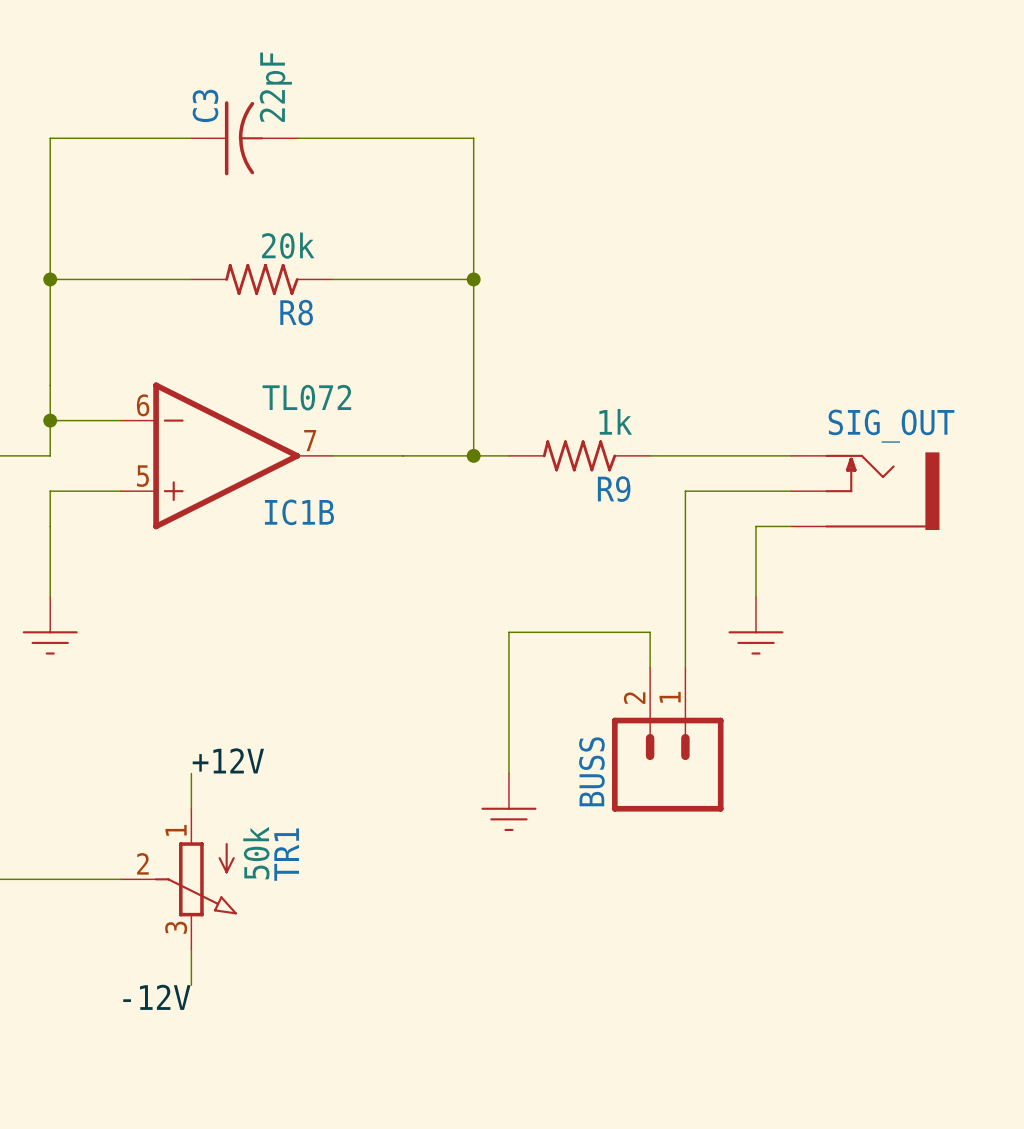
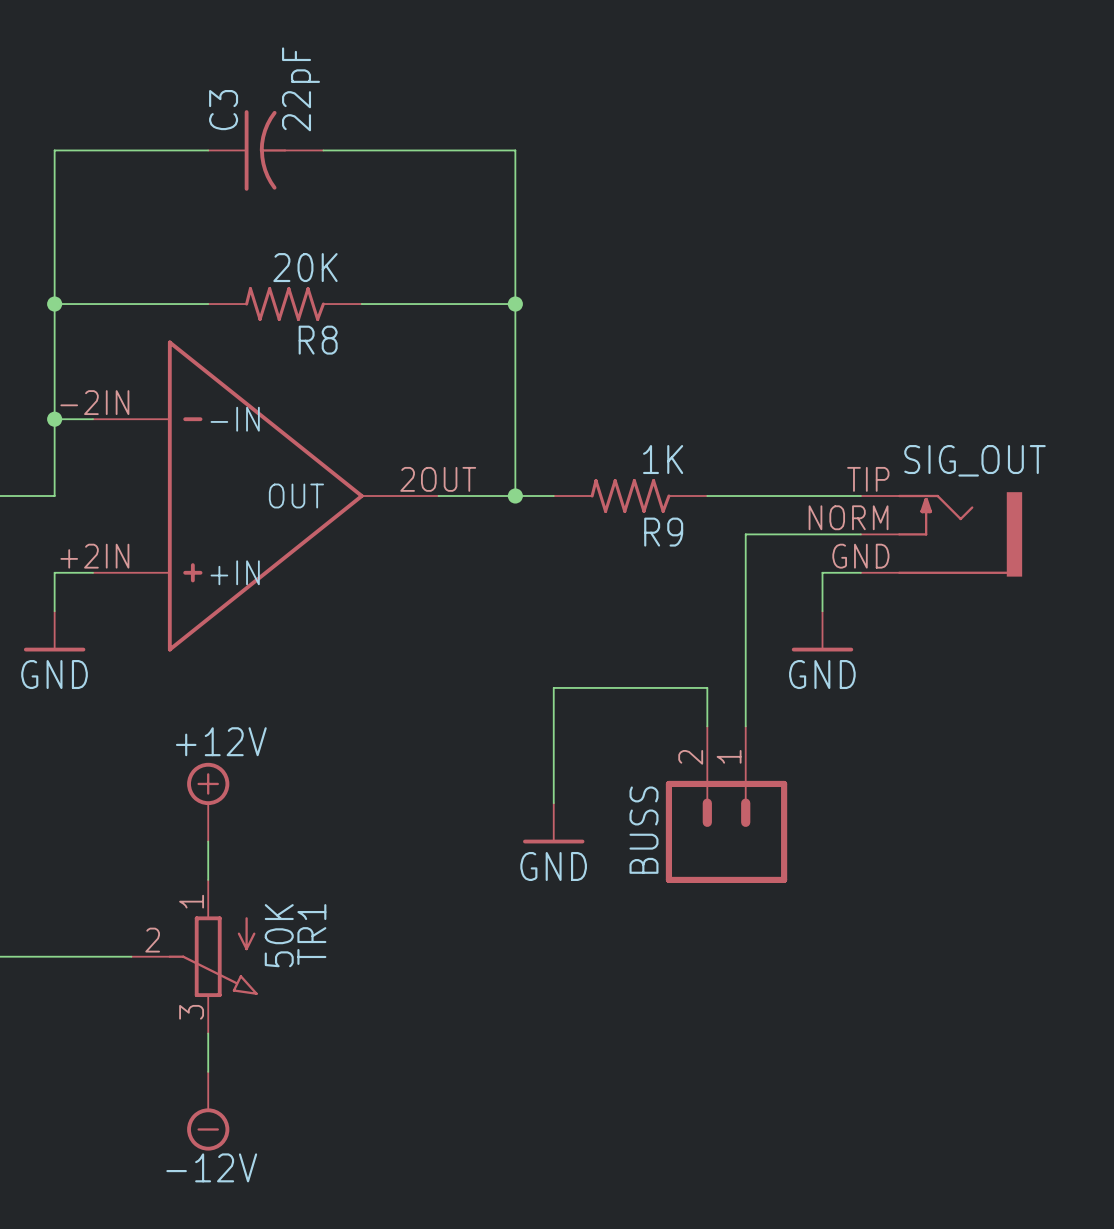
R8 value: 20k (288, 245) -> 20K (305, 267)
wire: none -> (54, 419) (93, 419)
wire: (50, 420) (120, 420) -> none
junction position: (50, 420) -> (54, 419)
R9 value: 1k (615, 421) -> 1K (663, 459)
SIG_OUT pin number: none -> TIP (868, 479)
IC1B: TL072 (226, 455) -> none
part: none -> (265, 496)
SIG_OUT pin number: none -> NORM (848, 517)
wire: (120, 491) (50, 491) (50, 526) -> (93, 572) (54, 572)
SIG_OUT pin number: none -> GND (860, 556)
power symbol: none -> GND (54, 631)
power symbol: none -> GND (822, 631)
power symbol: (50, 625) -> none
power symbol: (755, 625) -> none
power symbol: none -> +12V (208, 802)
power symbol: none -> GND (553, 823)
label: +12V (228, 760) -> none
power symbol: (508, 802) -> none
TR1 value: 50k (256, 853) -> 50K (279, 935)
label: -12V (156, 997) -> none
power symbol: none -> -12V (208, 1111)

